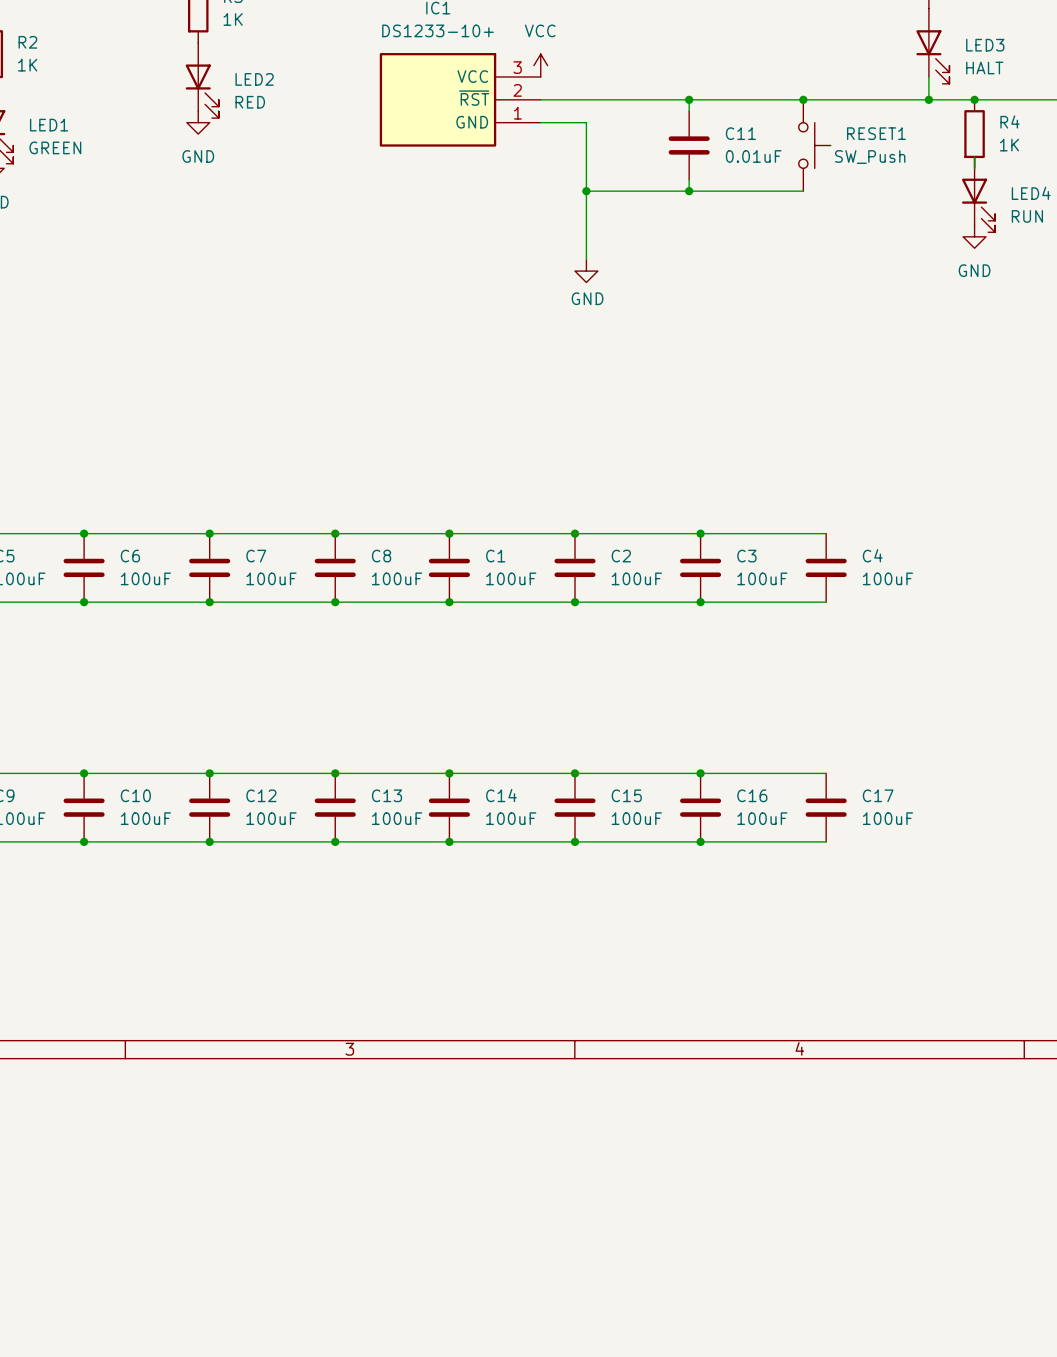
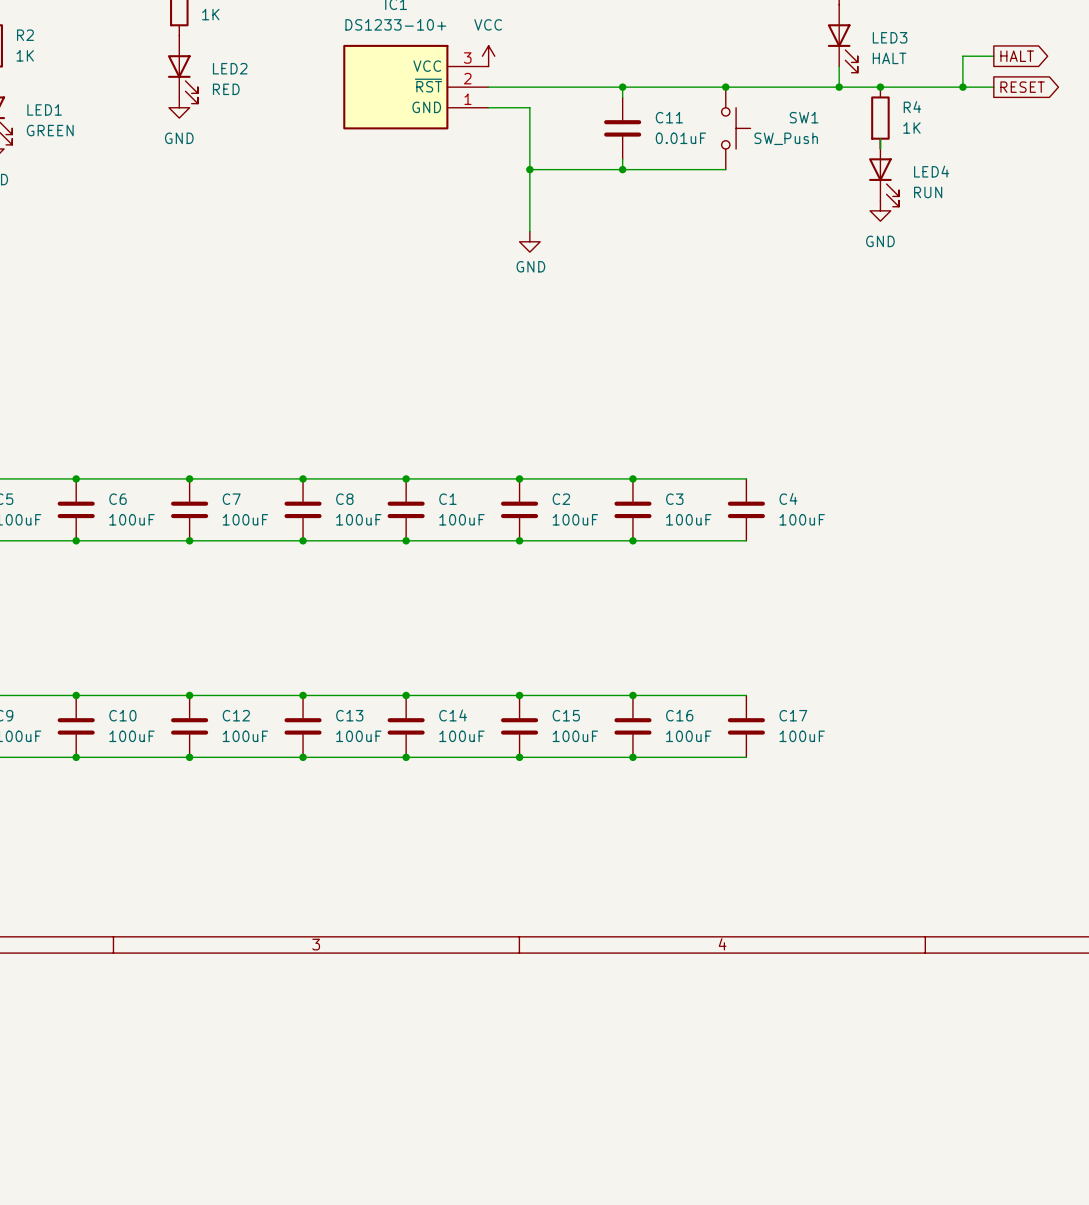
RESET1 name: RESET1 (876, 133) -> SW1 (804, 117)

